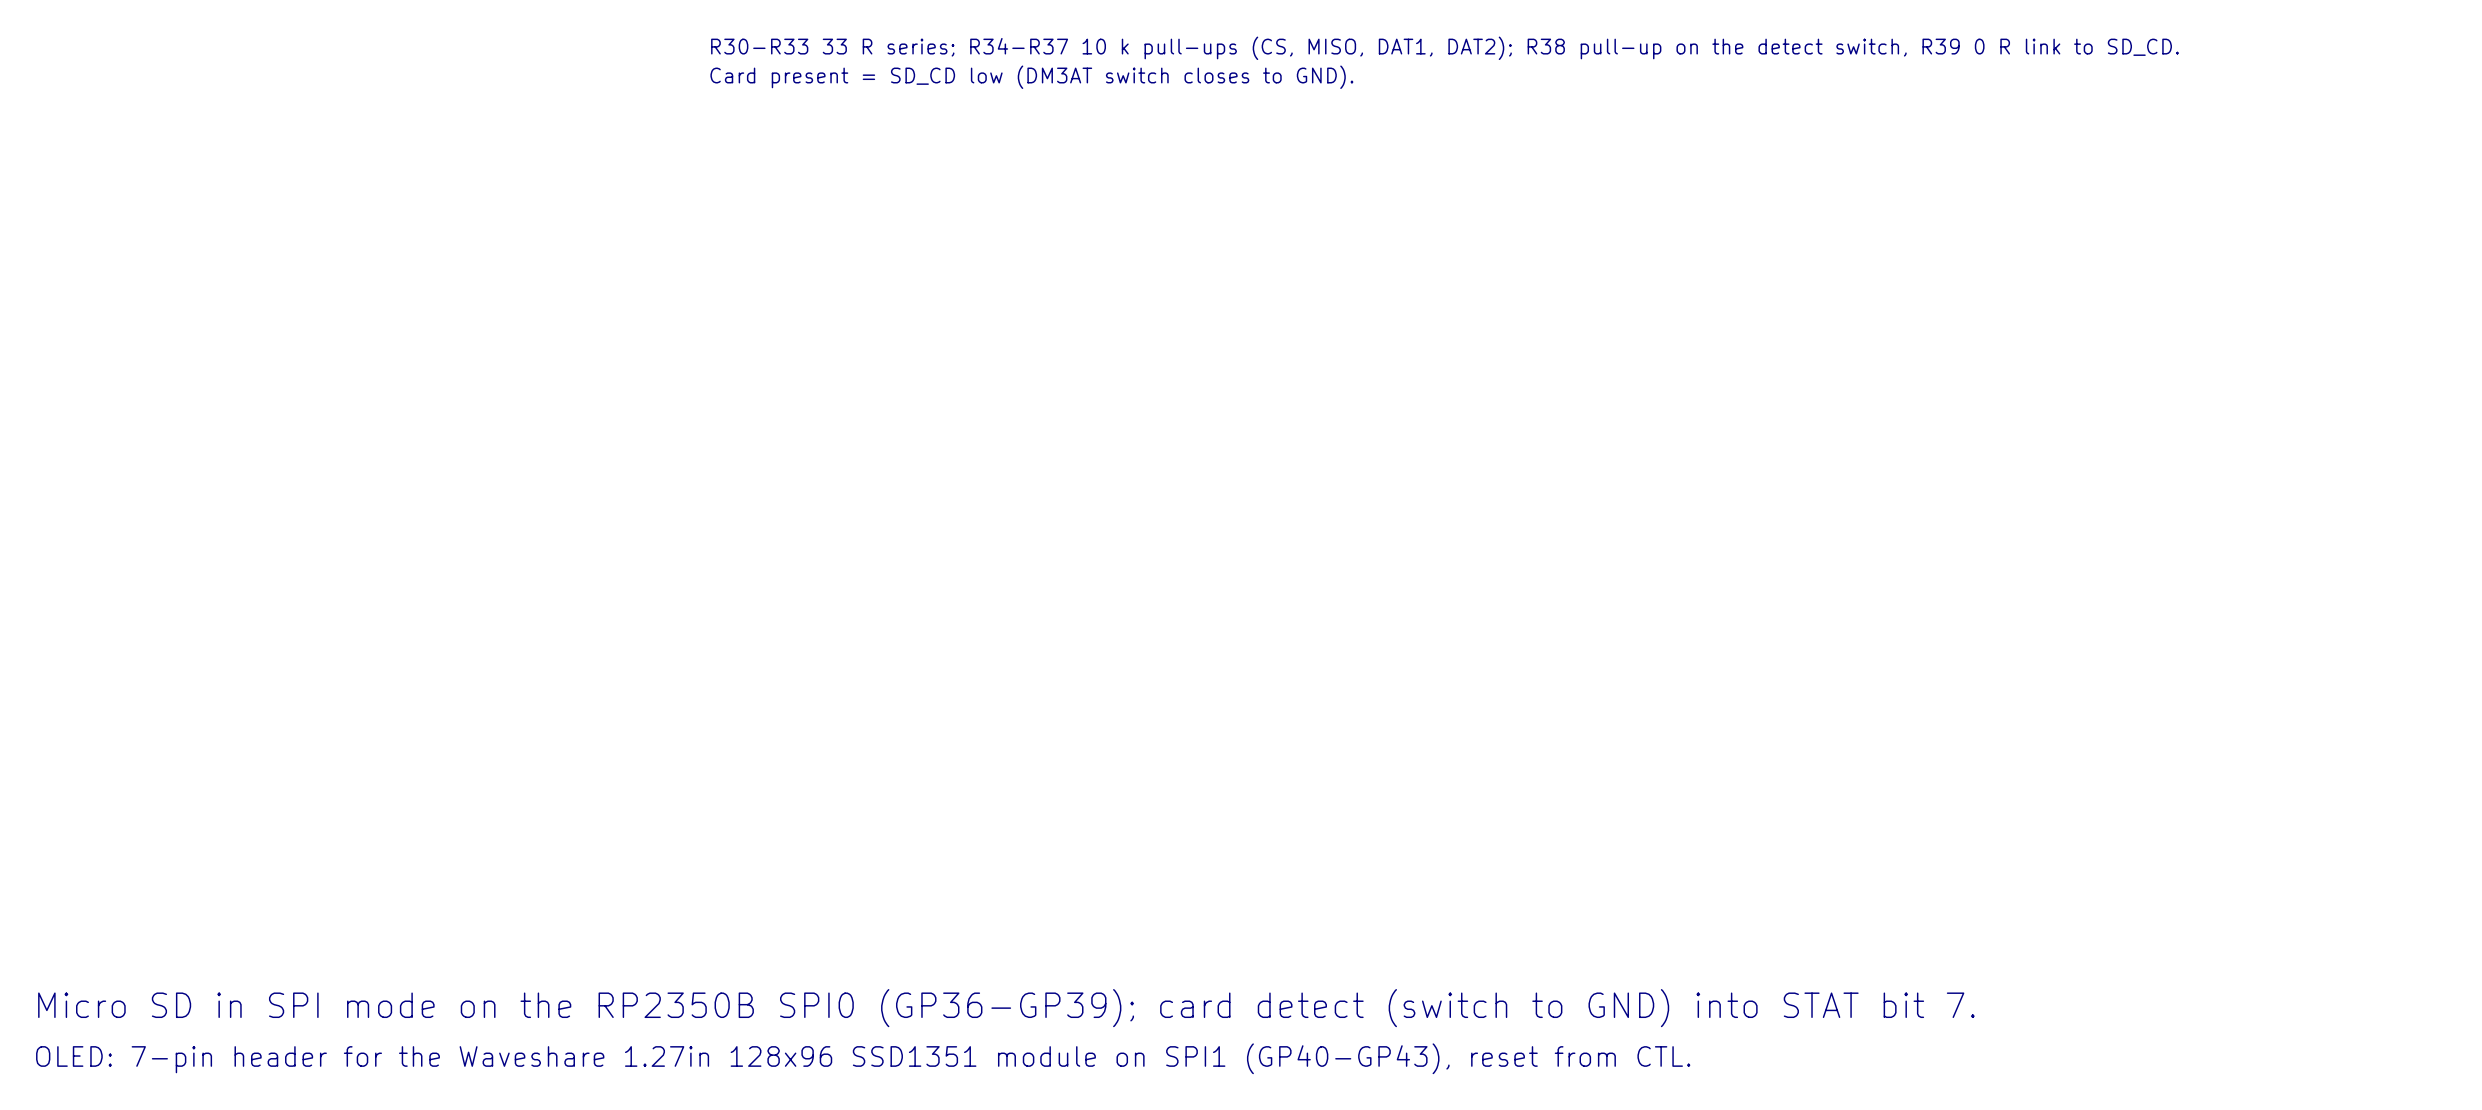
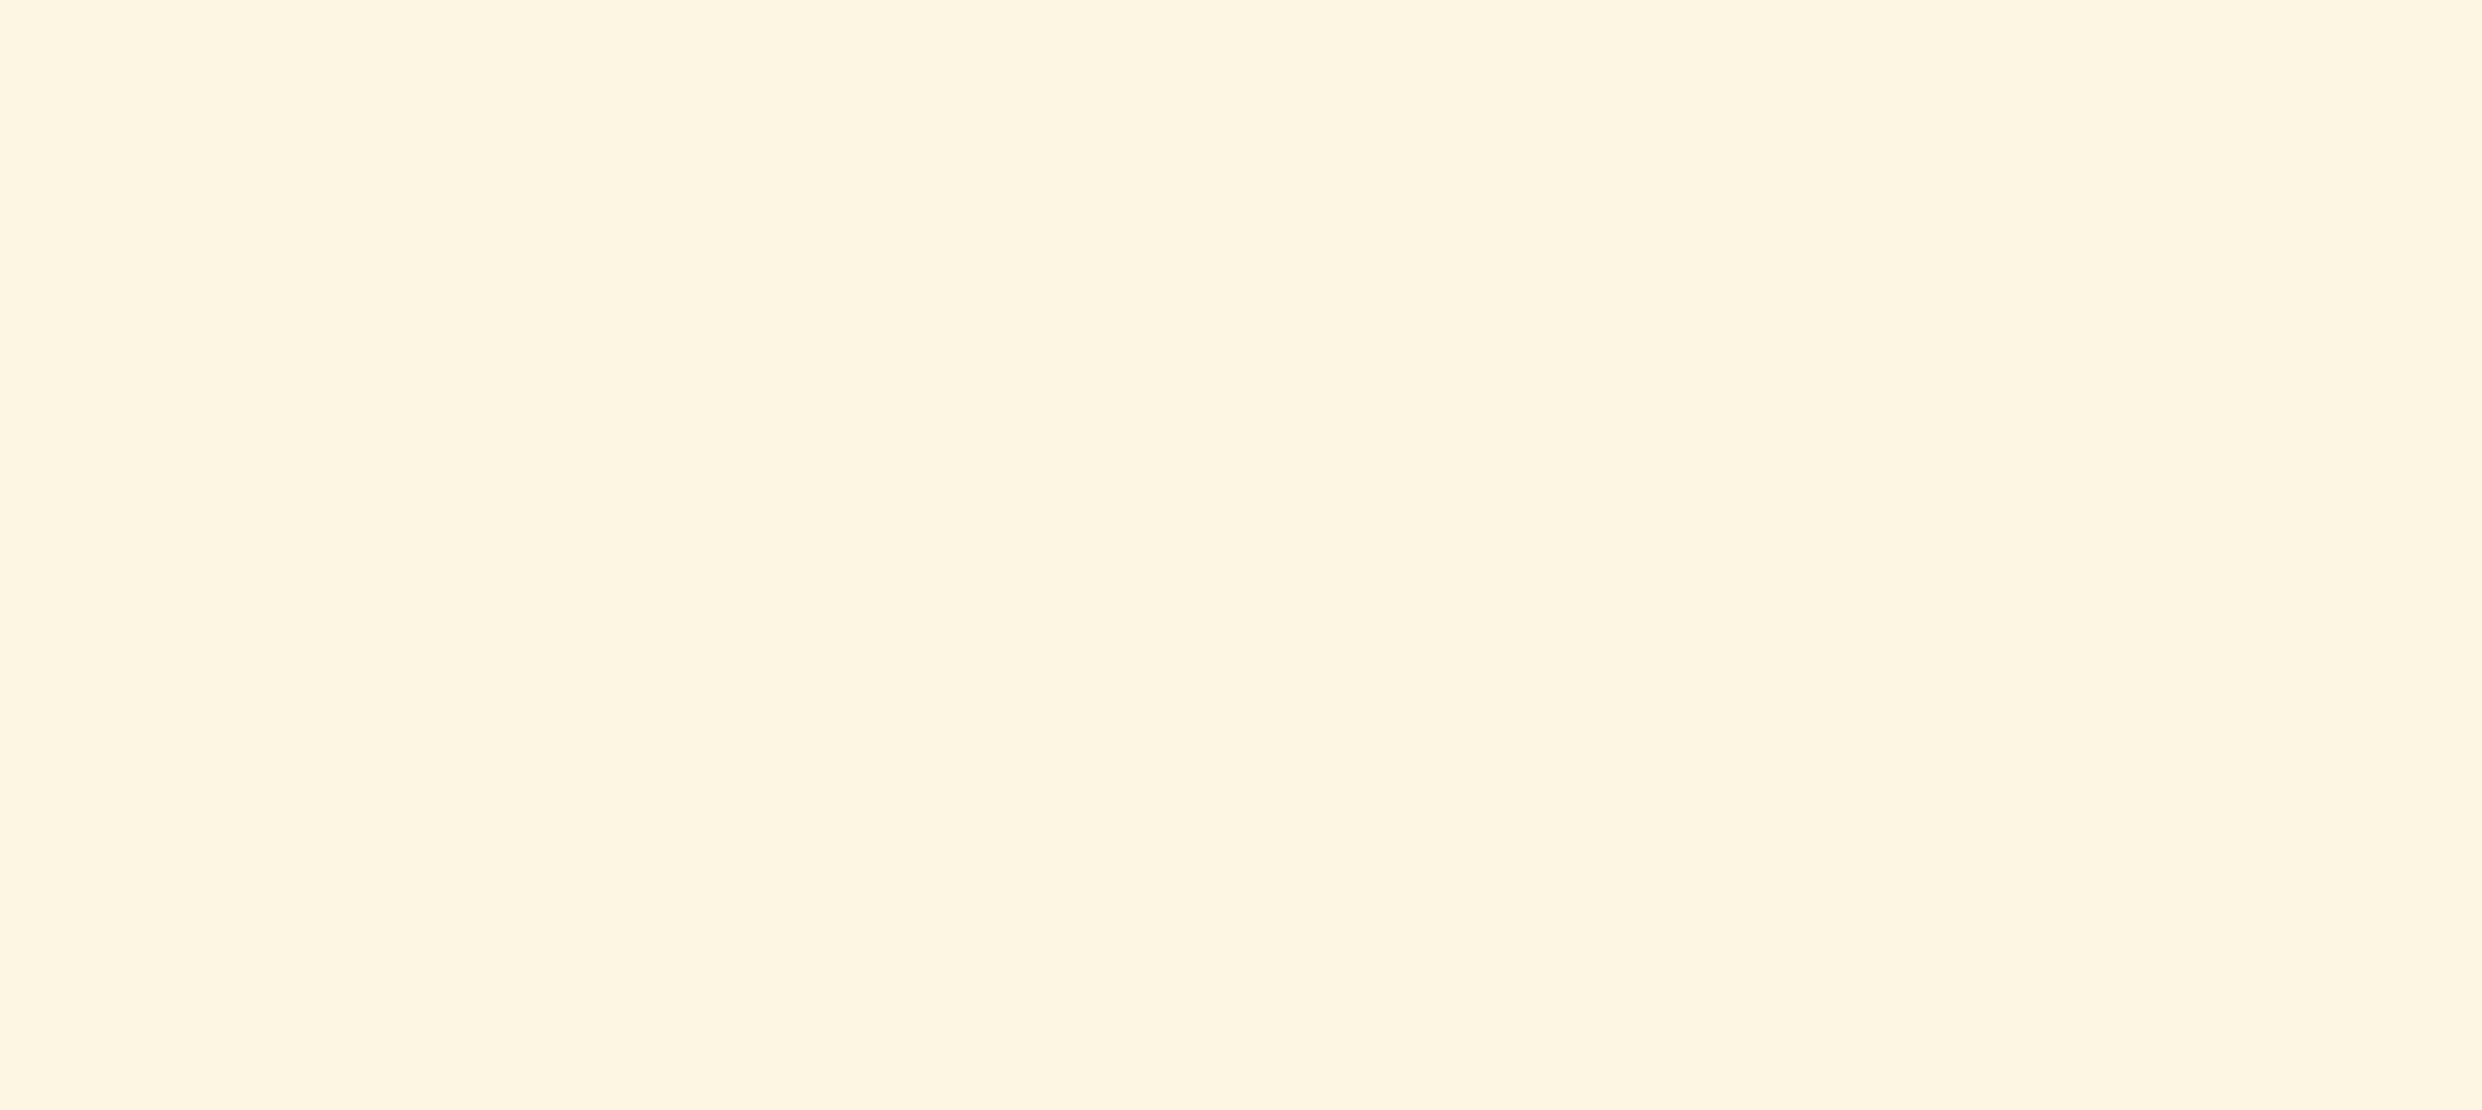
text: R30-R33 33 R series; R34-R37 10 k pull-ups (CS, MISO, DAT1, DAT2); R38 pull-up on the detect switch, R39 0 R link to SD_CD. (1444, 48) -> none
text: Card present = SD_CD low (DM3AT switch closes to GND). (1031, 77) -> none
text: Micro SD in SPI mode on the RP2350B SPI0 (GP36-GP39); card detect (switch to GND) into STAT bit 7. (1006, 1008) -> none
text: OLED: 7-pin header for the Waveshare 1.27in 128x96 SSD1351 module on SPI1 (GP40-GP43), reset from CTL. (863, 1058) -> none

